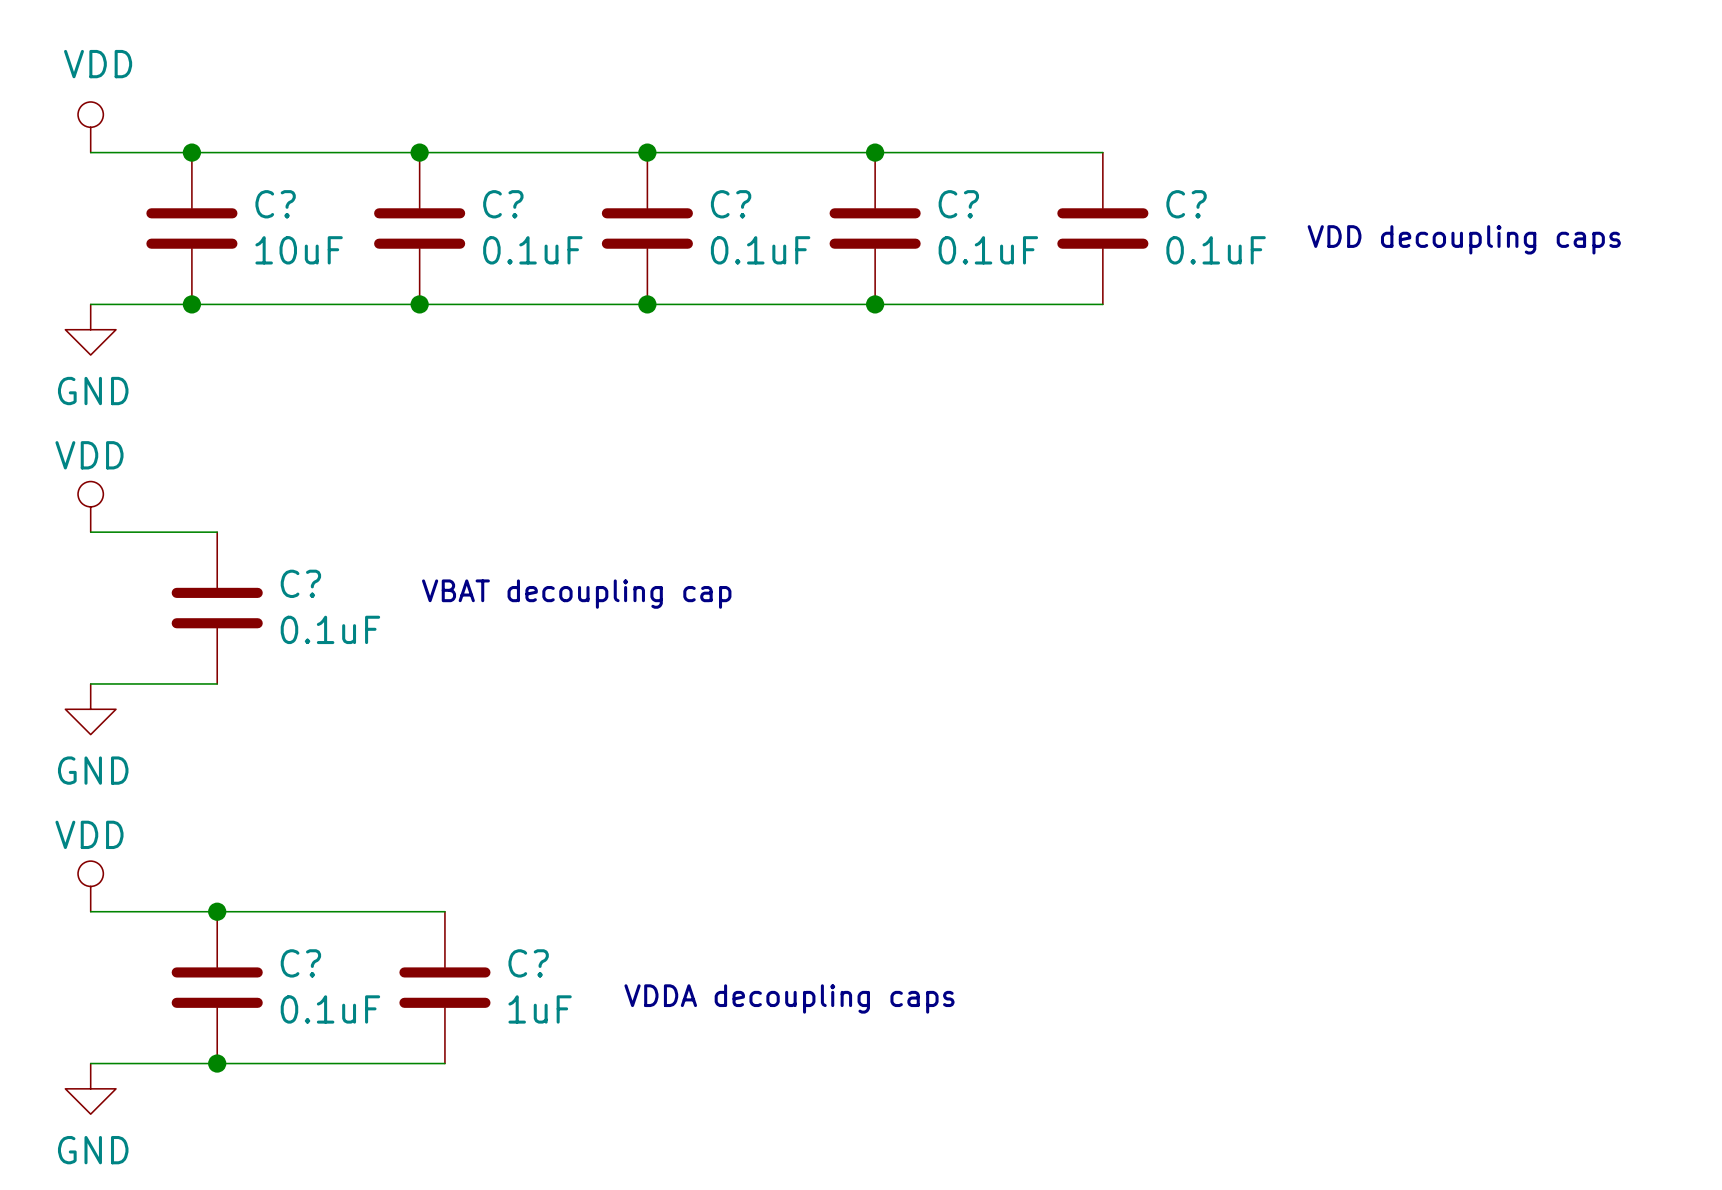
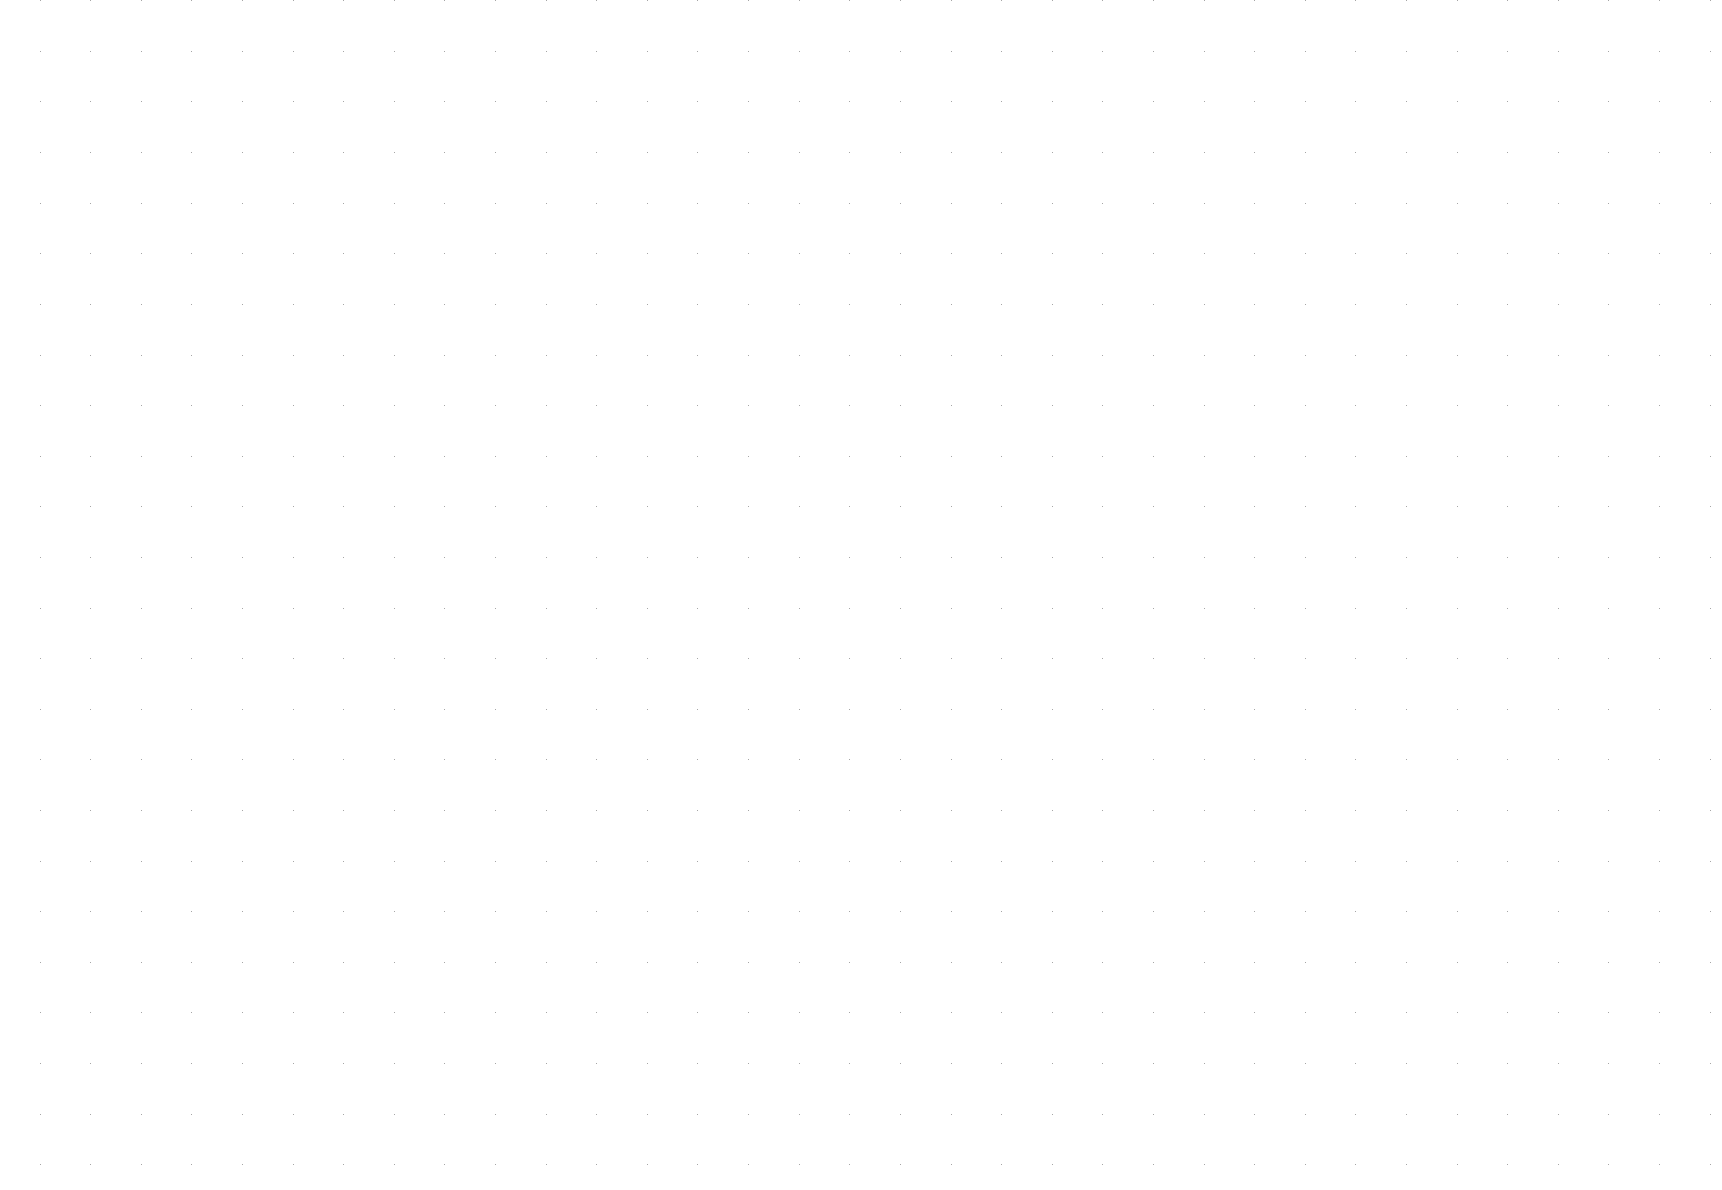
power symbol: VDD (90, 127) -> none
wire: (90, 152) (1102, 152) -> none
junction: (191, 152) -> none
junction: (419, 152) -> none
junction: (647, 152) -> none
junction: (875, 152) -> none
C?: 10uF (191, 228) -> none
C?: 0.1uF (419, 228) -> none
C?: 0.1uF (647, 228) -> none
C?: 0.1uF (875, 228) -> none
C?: 0.1uF (1102, 228) -> none
text: VDD decoupling caps (1464, 239) -> none
wire: (90, 304) (1102, 304) -> none
junction: (191, 304) -> none
junction: (419, 304) -> none
junction: (647, 304) -> none
junction: (875, 304) -> none
power symbol: GND (90, 329) -> none
power symbol: VDD (90, 506) -> none
wire: (90, 532) (217, 532) -> none
text: VBAT decoupling cap (576, 594) -> none
C?: 0.1uF (217, 608) -> none
wire: (90, 683) (217, 683) -> none
power symbol: GND (90, 709) -> none
power symbol: VDD (90, 886) -> none
wire: (90, 911) (444, 911) -> none
junction: (217, 911) -> none
C?: 0.1uF (217, 987) -> none
C?: 1uF (444, 987) -> none
text: VDDA decoupling caps (789, 998) -> none
wire: (90, 1063) (444, 1063) -> none
junction: (217, 1063) -> none
power symbol: GND (90, 1088) -> none

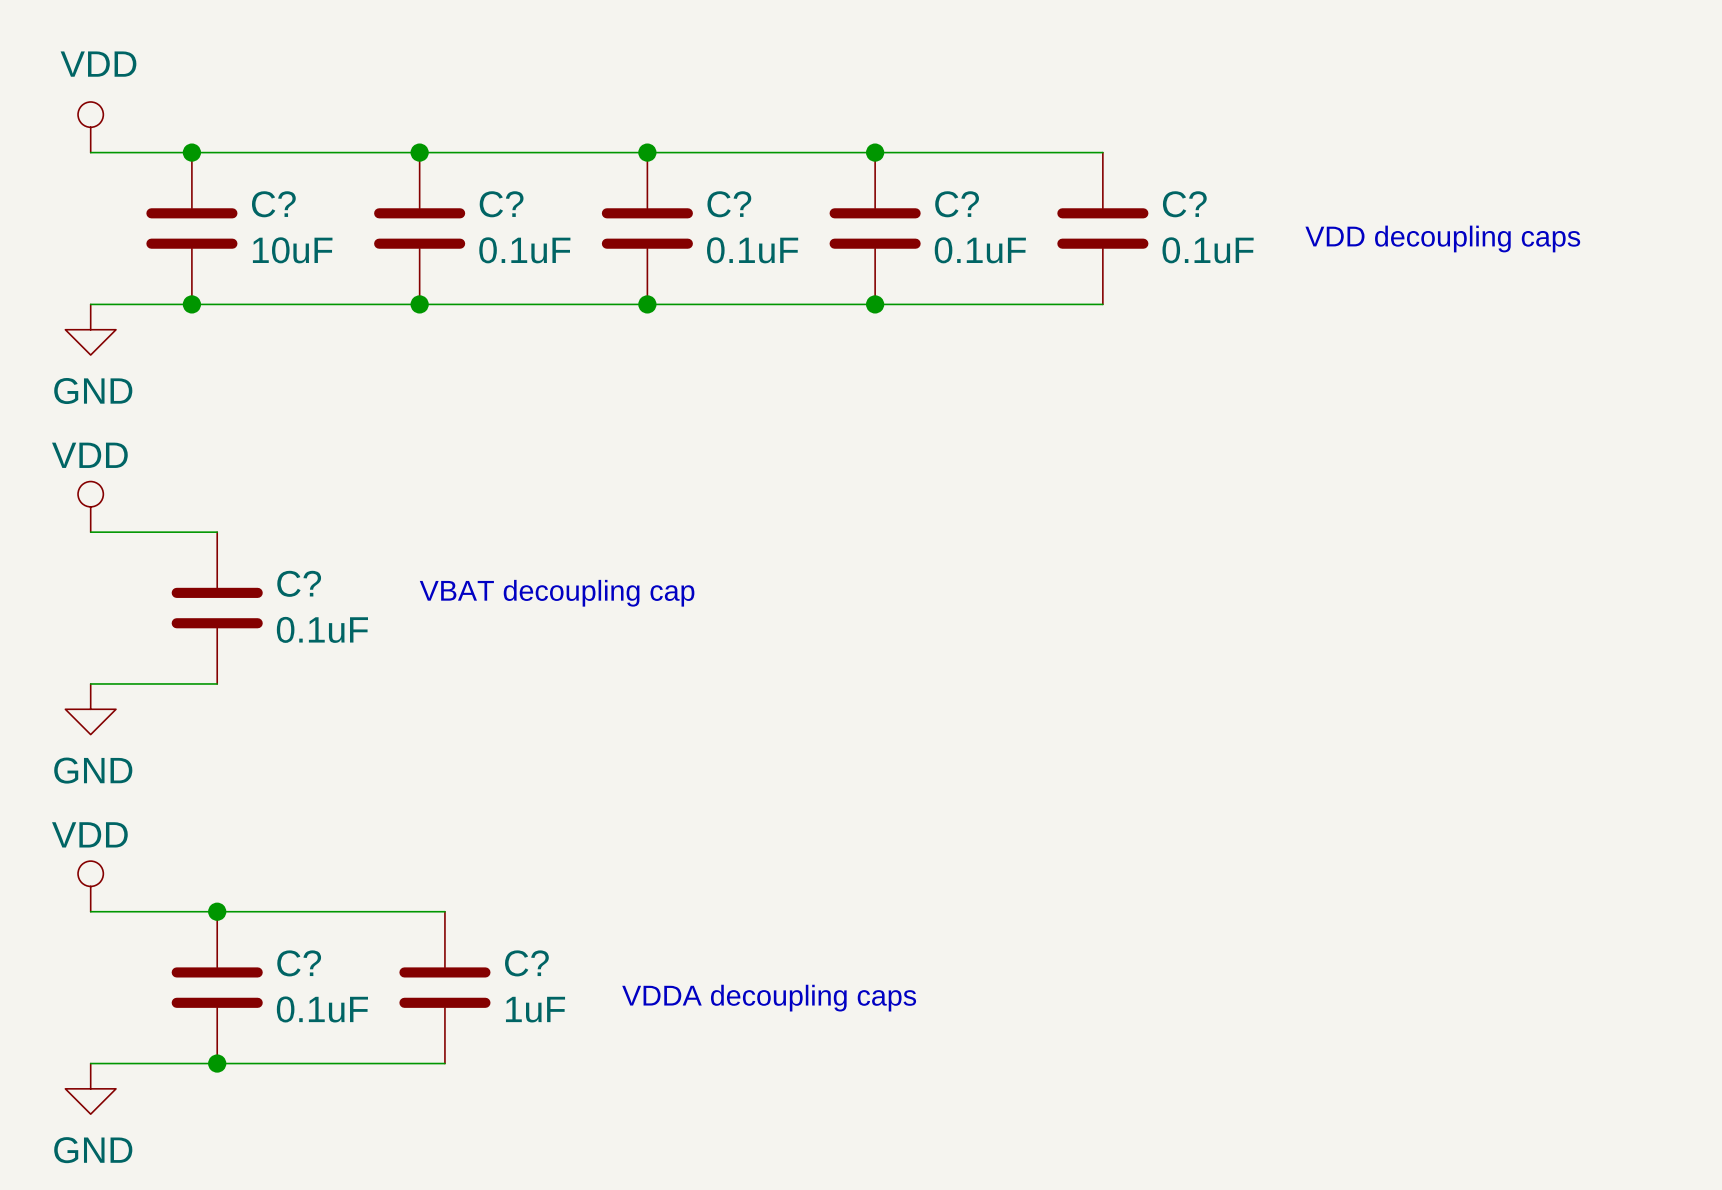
power symbol: none -> VDD (90, 127)
wire: none -> (90, 152) (1102, 152)
junction: none -> (191, 152)
junction: none -> (419, 152)
junction: none -> (647, 152)
junction: none -> (875, 152)
C?: none -> 10uF (191, 228)
C?: none -> 0.1uF (419, 228)
C?: none -> 0.1uF (647, 228)
C?: none -> 0.1uF (875, 228)
C?: none -> 0.1uF (1102, 228)
text: none -> VDD decoupling caps (1442, 238)
wire: none -> (90, 304) (1102, 304)
junction: none -> (191, 304)
junction: none -> (419, 304)
junction: none -> (647, 304)
junction: none -> (875, 304)
power symbol: none -> GND (90, 329)
power symbol: none -> VDD (90, 506)
wire: none -> (90, 532) (217, 532)
text: none -> VBAT decoupling cap (557, 593)
C?: none -> 0.1uF (217, 608)
wire: none -> (90, 683) (217, 683)
power symbol: none -> GND (90, 709)
power symbol: none -> VDD (90, 886)
wire: none -> (90, 911) (444, 911)
junction: none -> (217, 911)
C?: none -> 0.1uF (217, 987)
C?: none -> 1uF (444, 987)
text: none -> VDDA decoupling caps (769, 998)
wire: none -> (90, 1063) (444, 1063)
junction: none -> (217, 1063)
power symbol: none -> GND (90, 1088)

